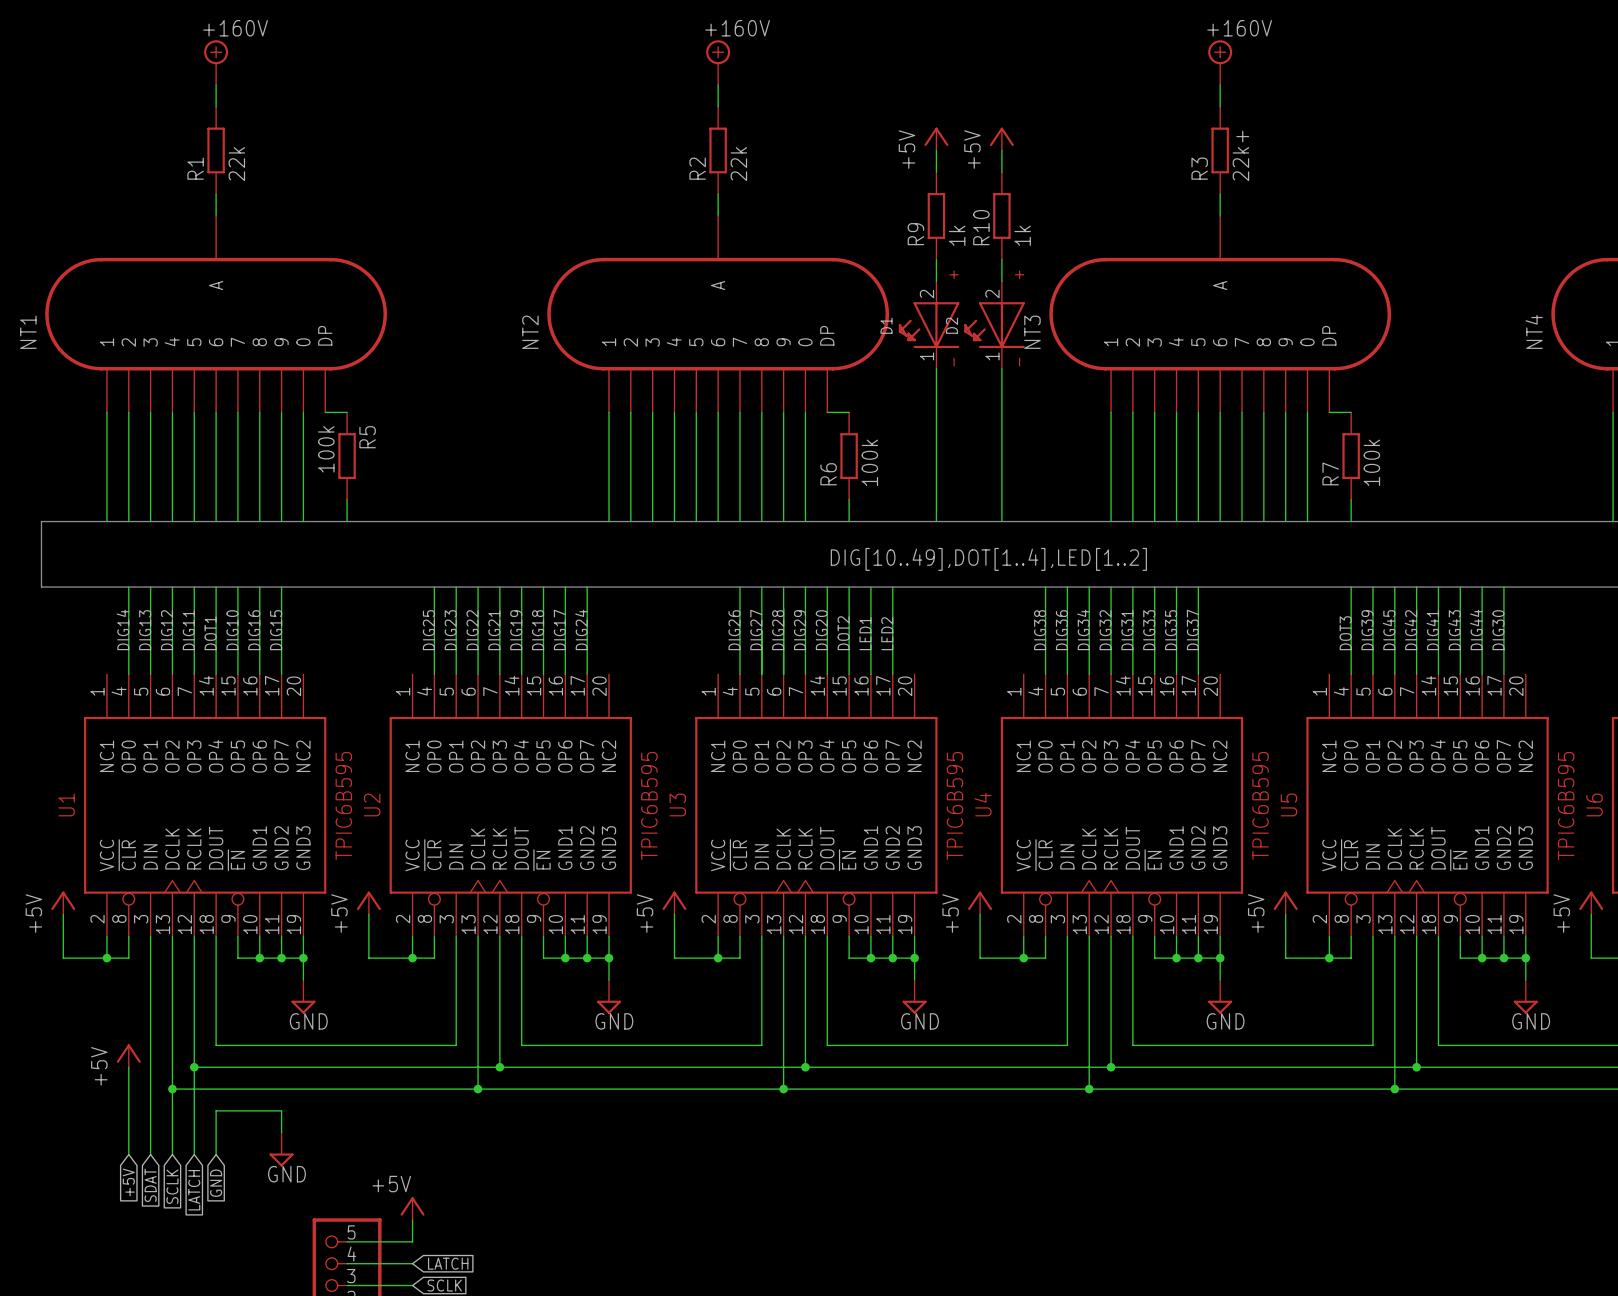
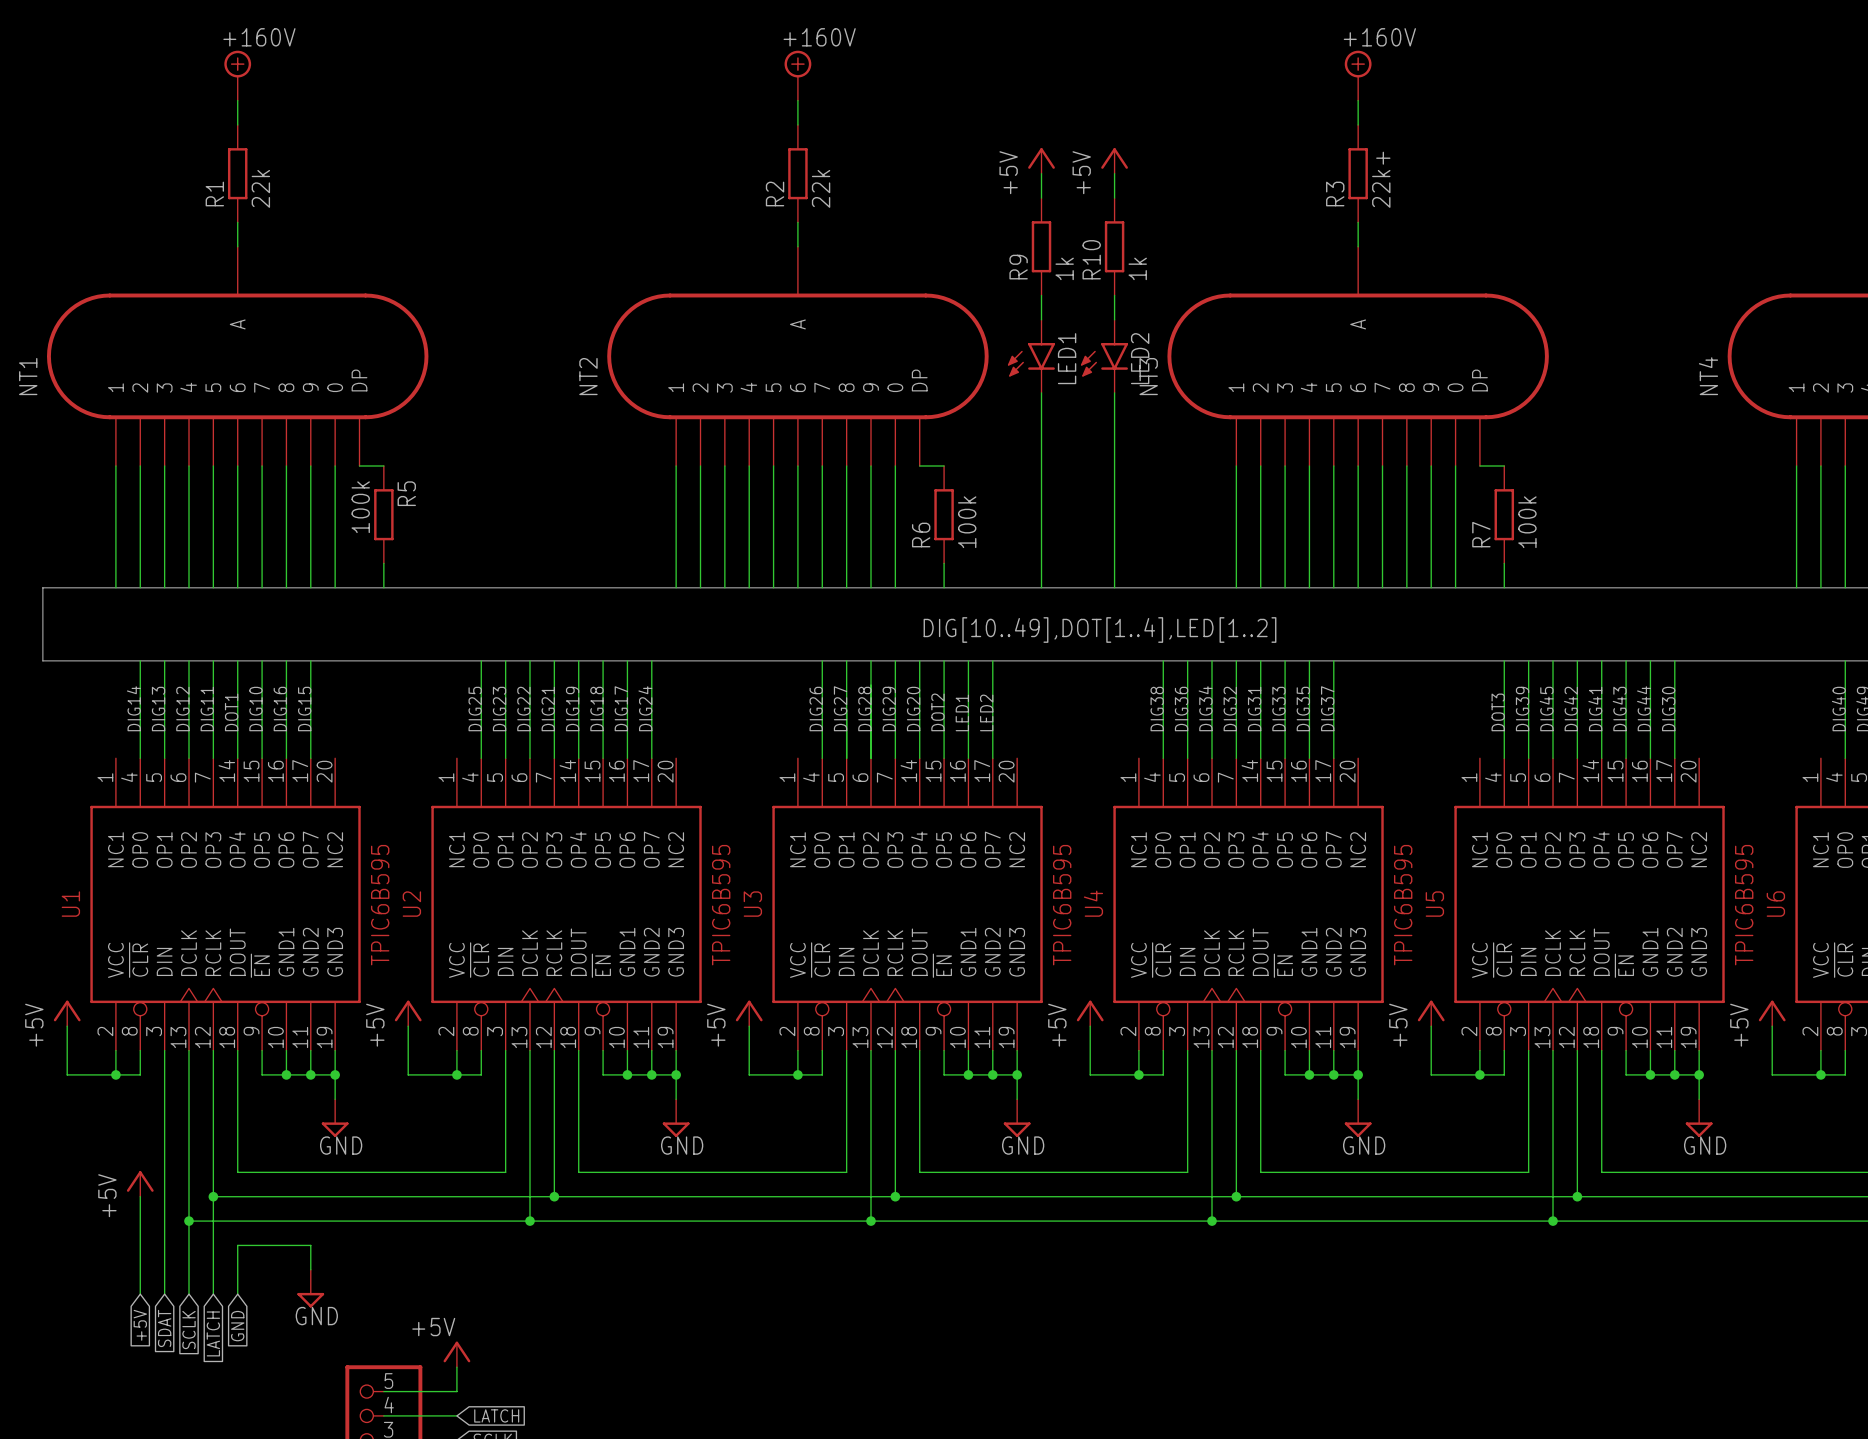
LED1: none -> (1031, 356)
LED2: none -> (1104, 356)
D1: (929, 325) -> none
D2: (994, 325) -> none

